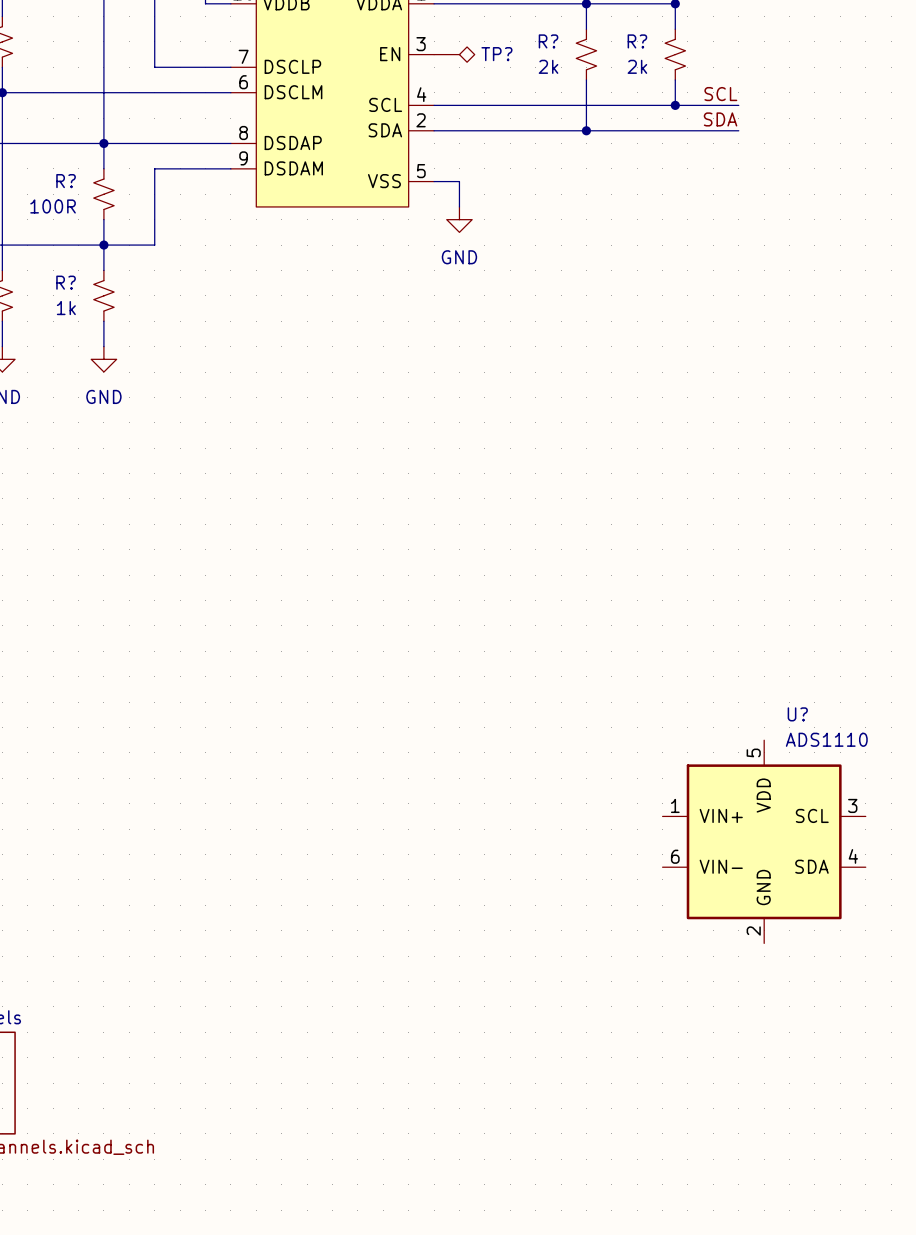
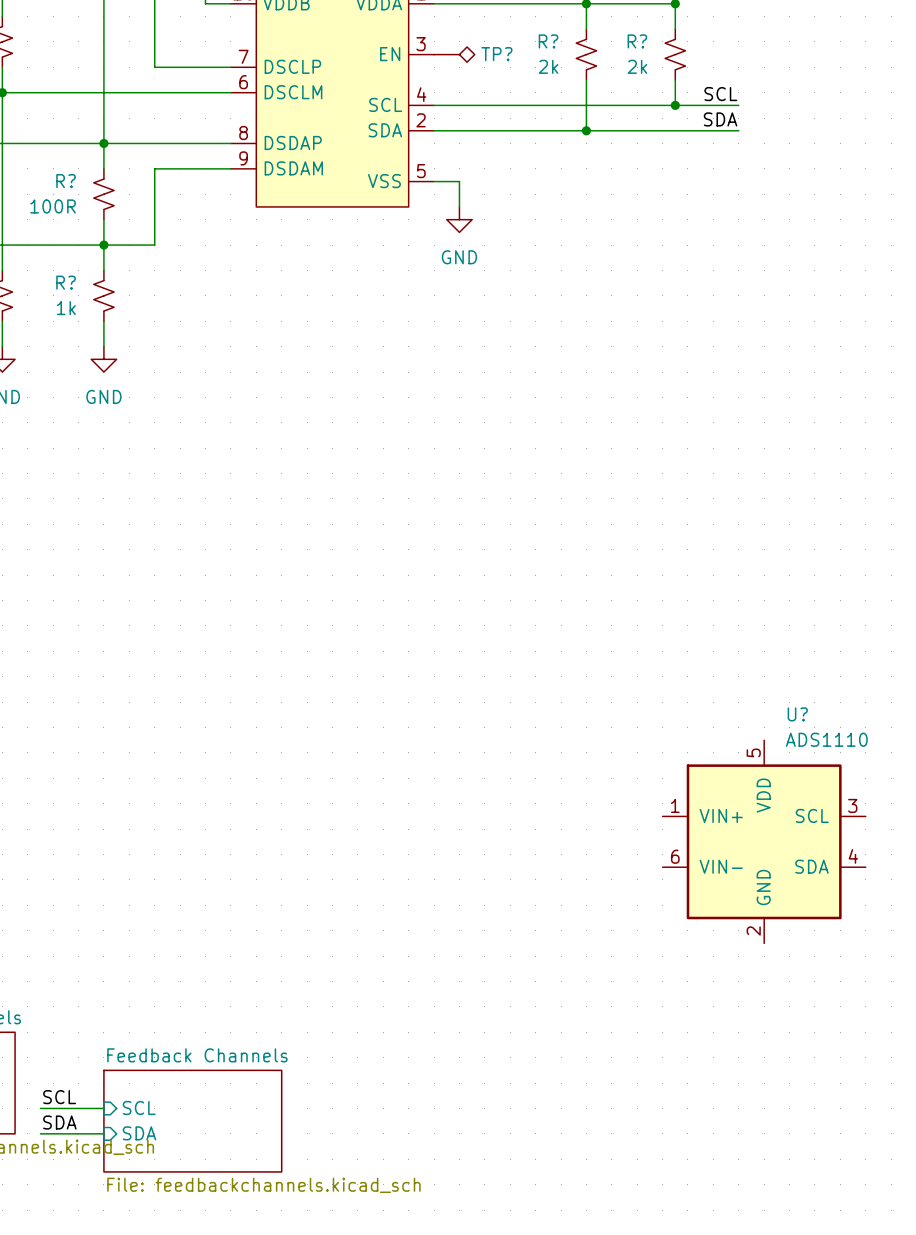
label: none -> SCL (59, 1097)
sheet pin: none -> SCL (139, 1107)
wire: none -> (40, 1108) (103, 1108)
sheet Feedback Channels: none -> File: feedbackchannels.kicad_sch (192, 1121)
label: none -> SDA (59, 1122)
wire: none -> (40, 1133) (103, 1133)
sheet pin: none -> SDA (139, 1133)

